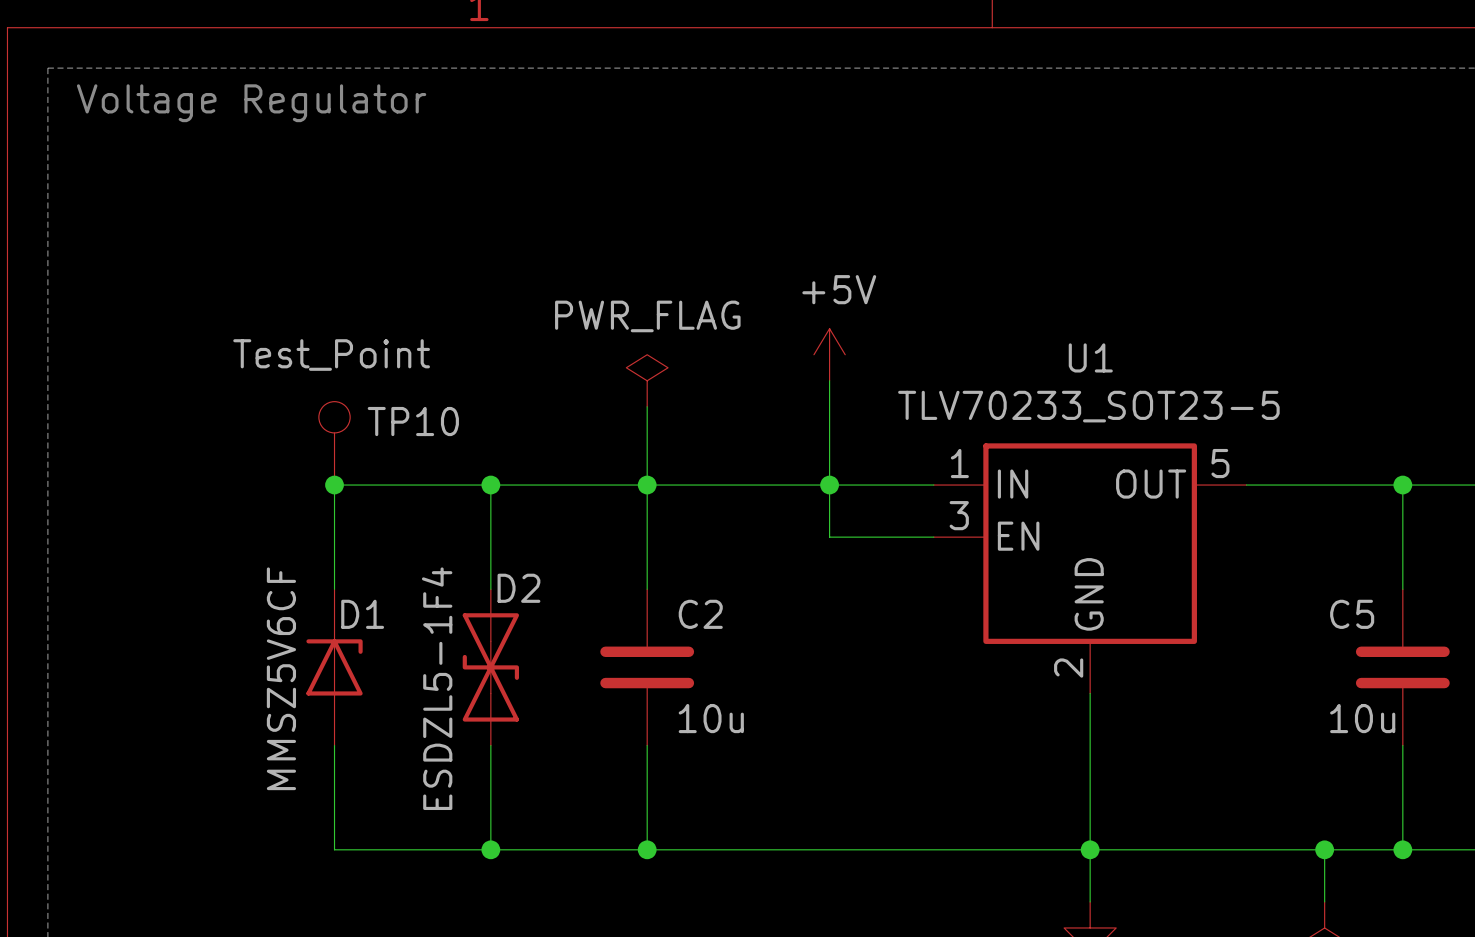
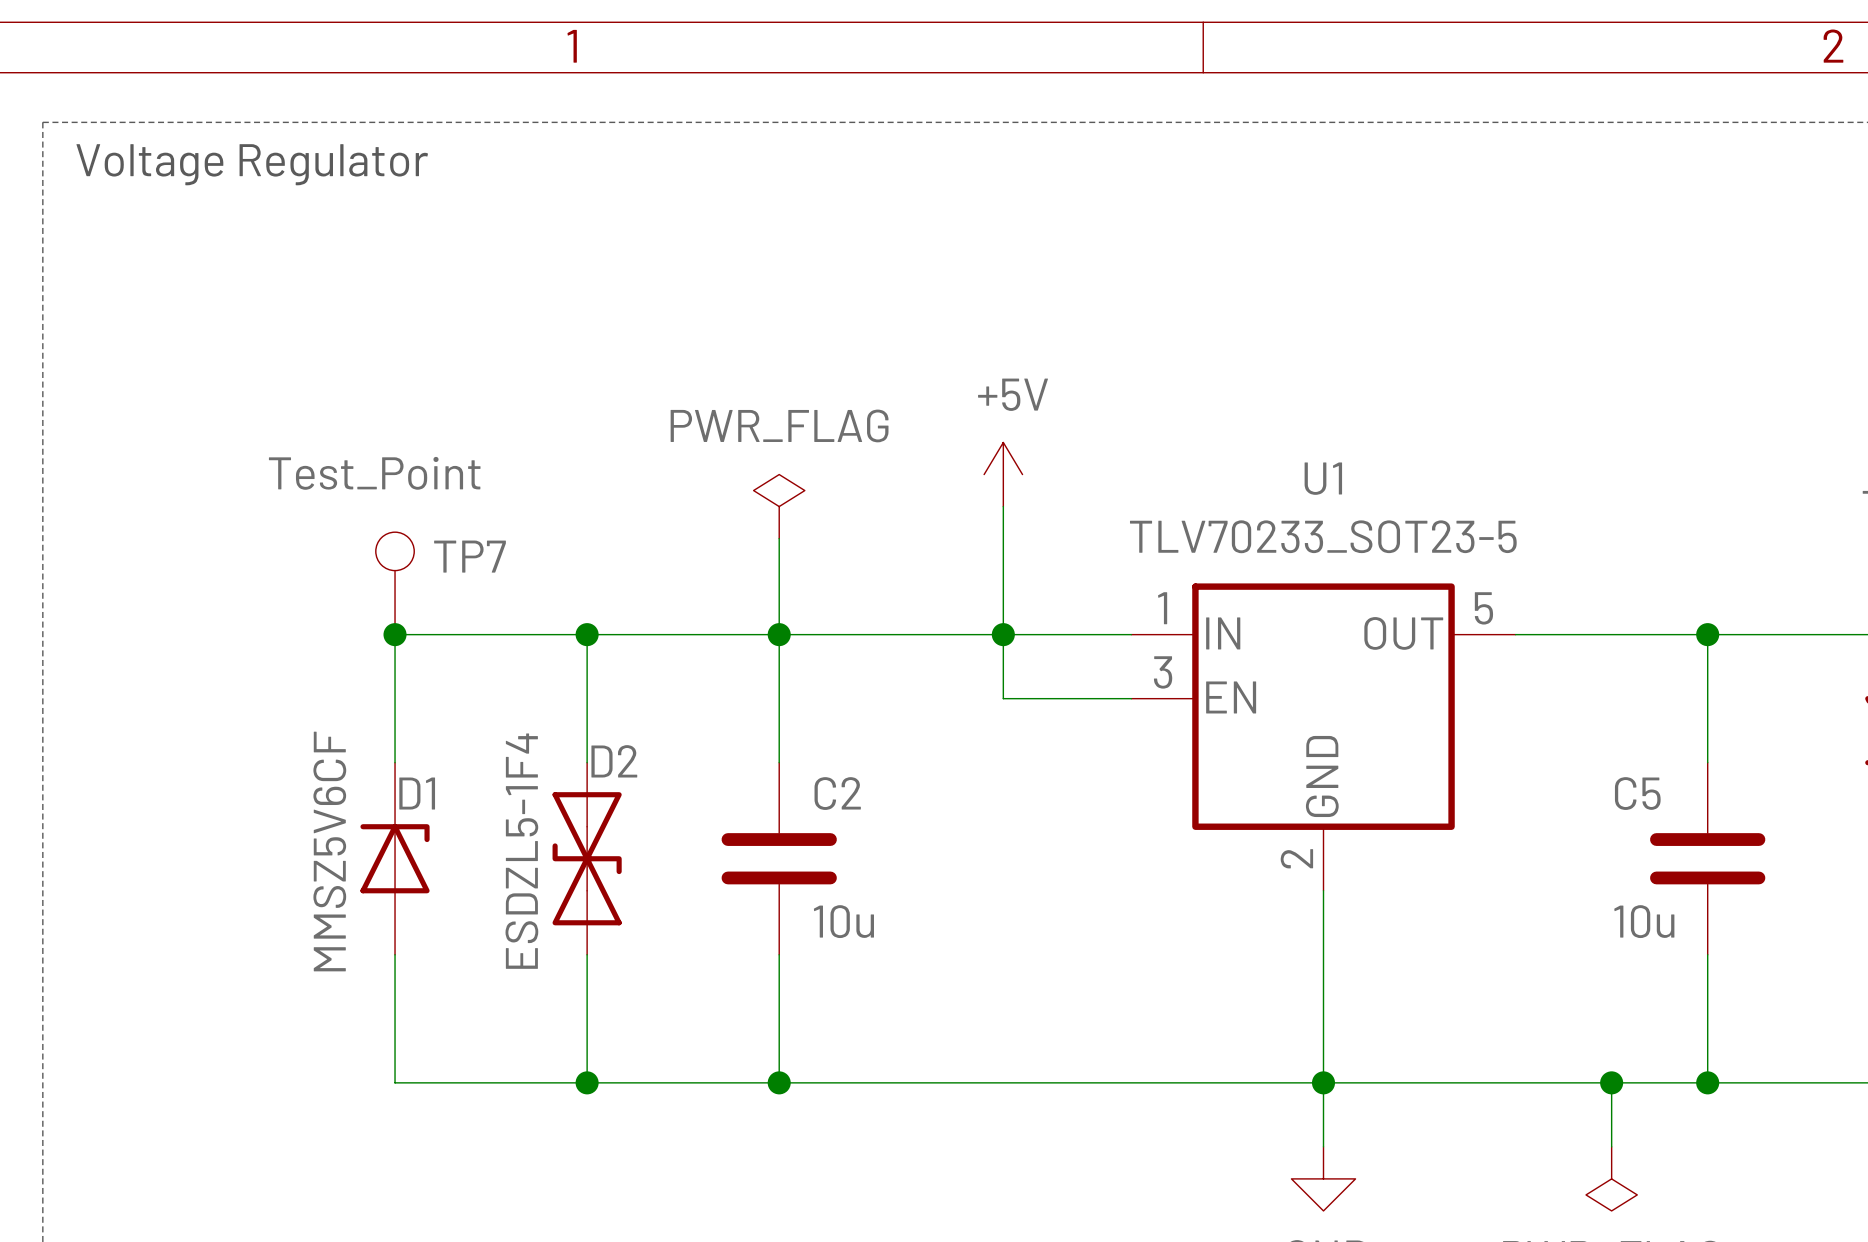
TP10 name: TP10 (413, 421) -> TP7 (470, 556)

